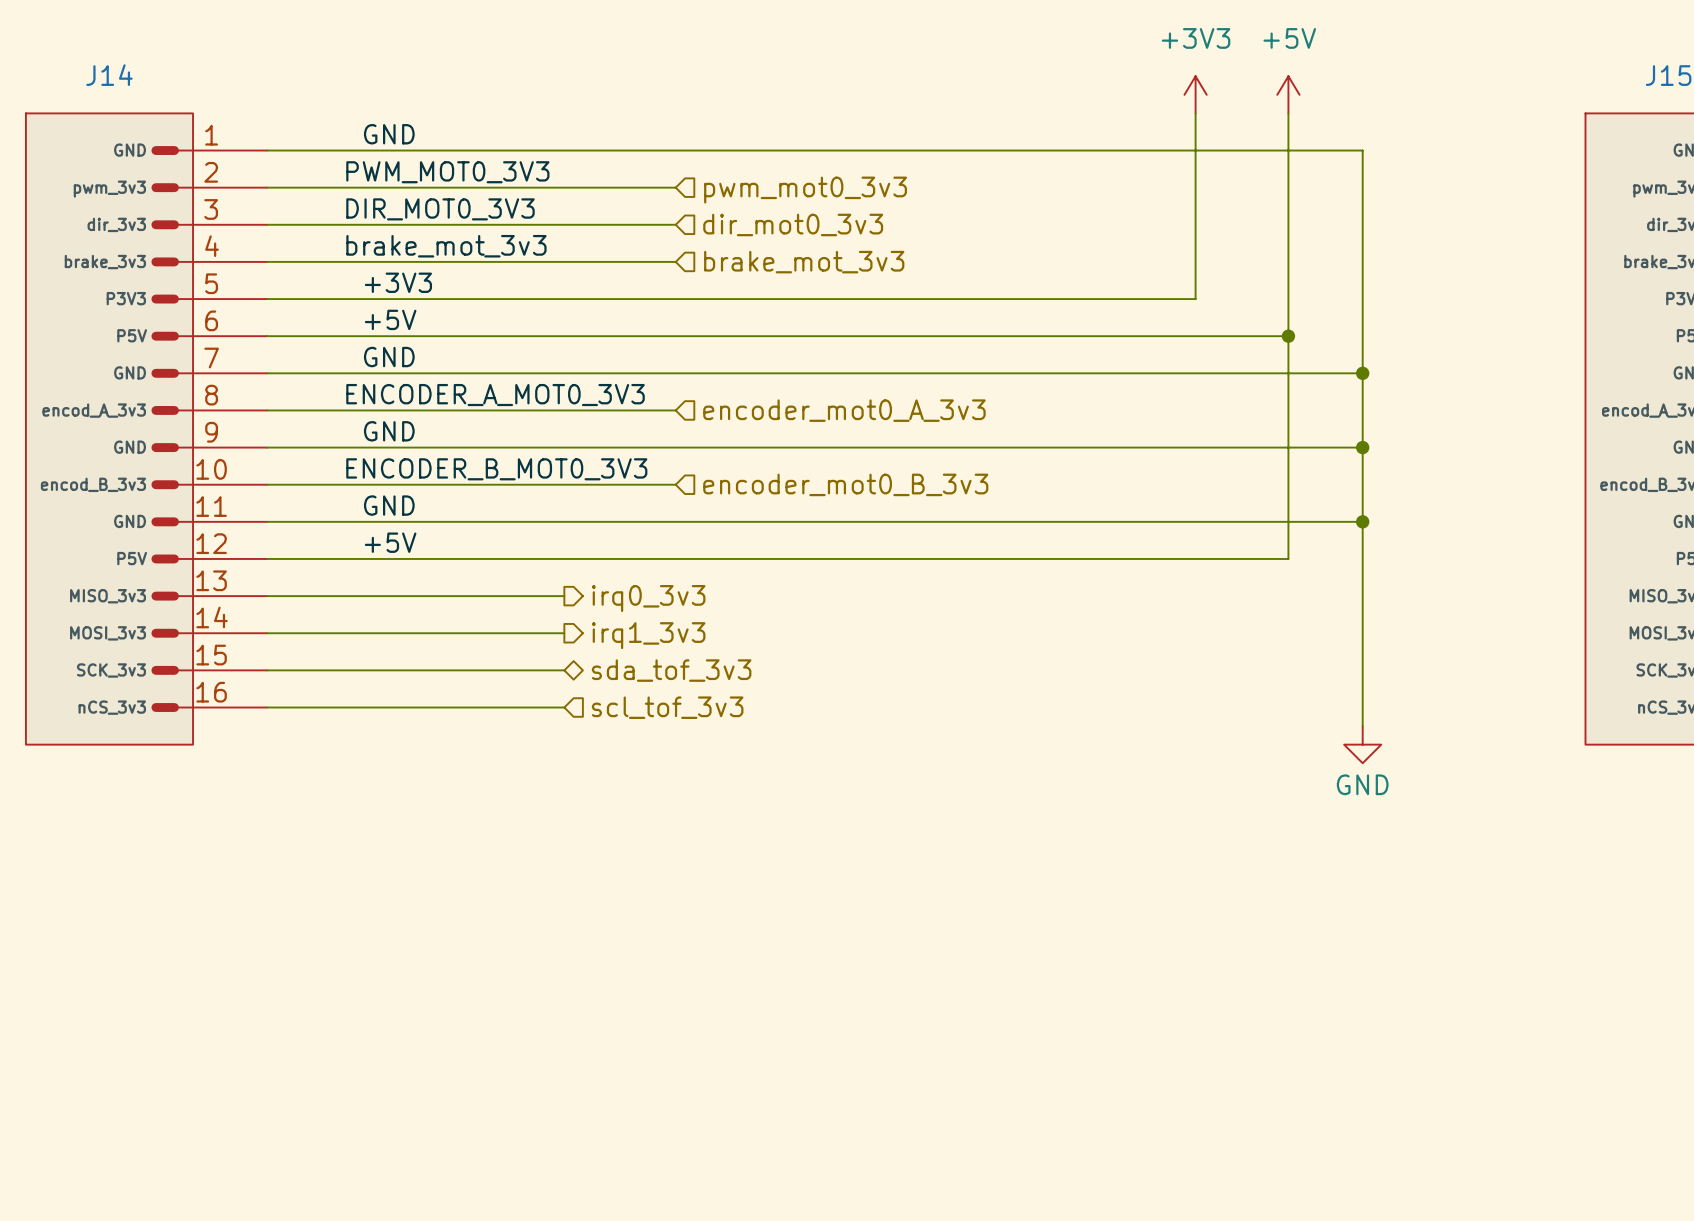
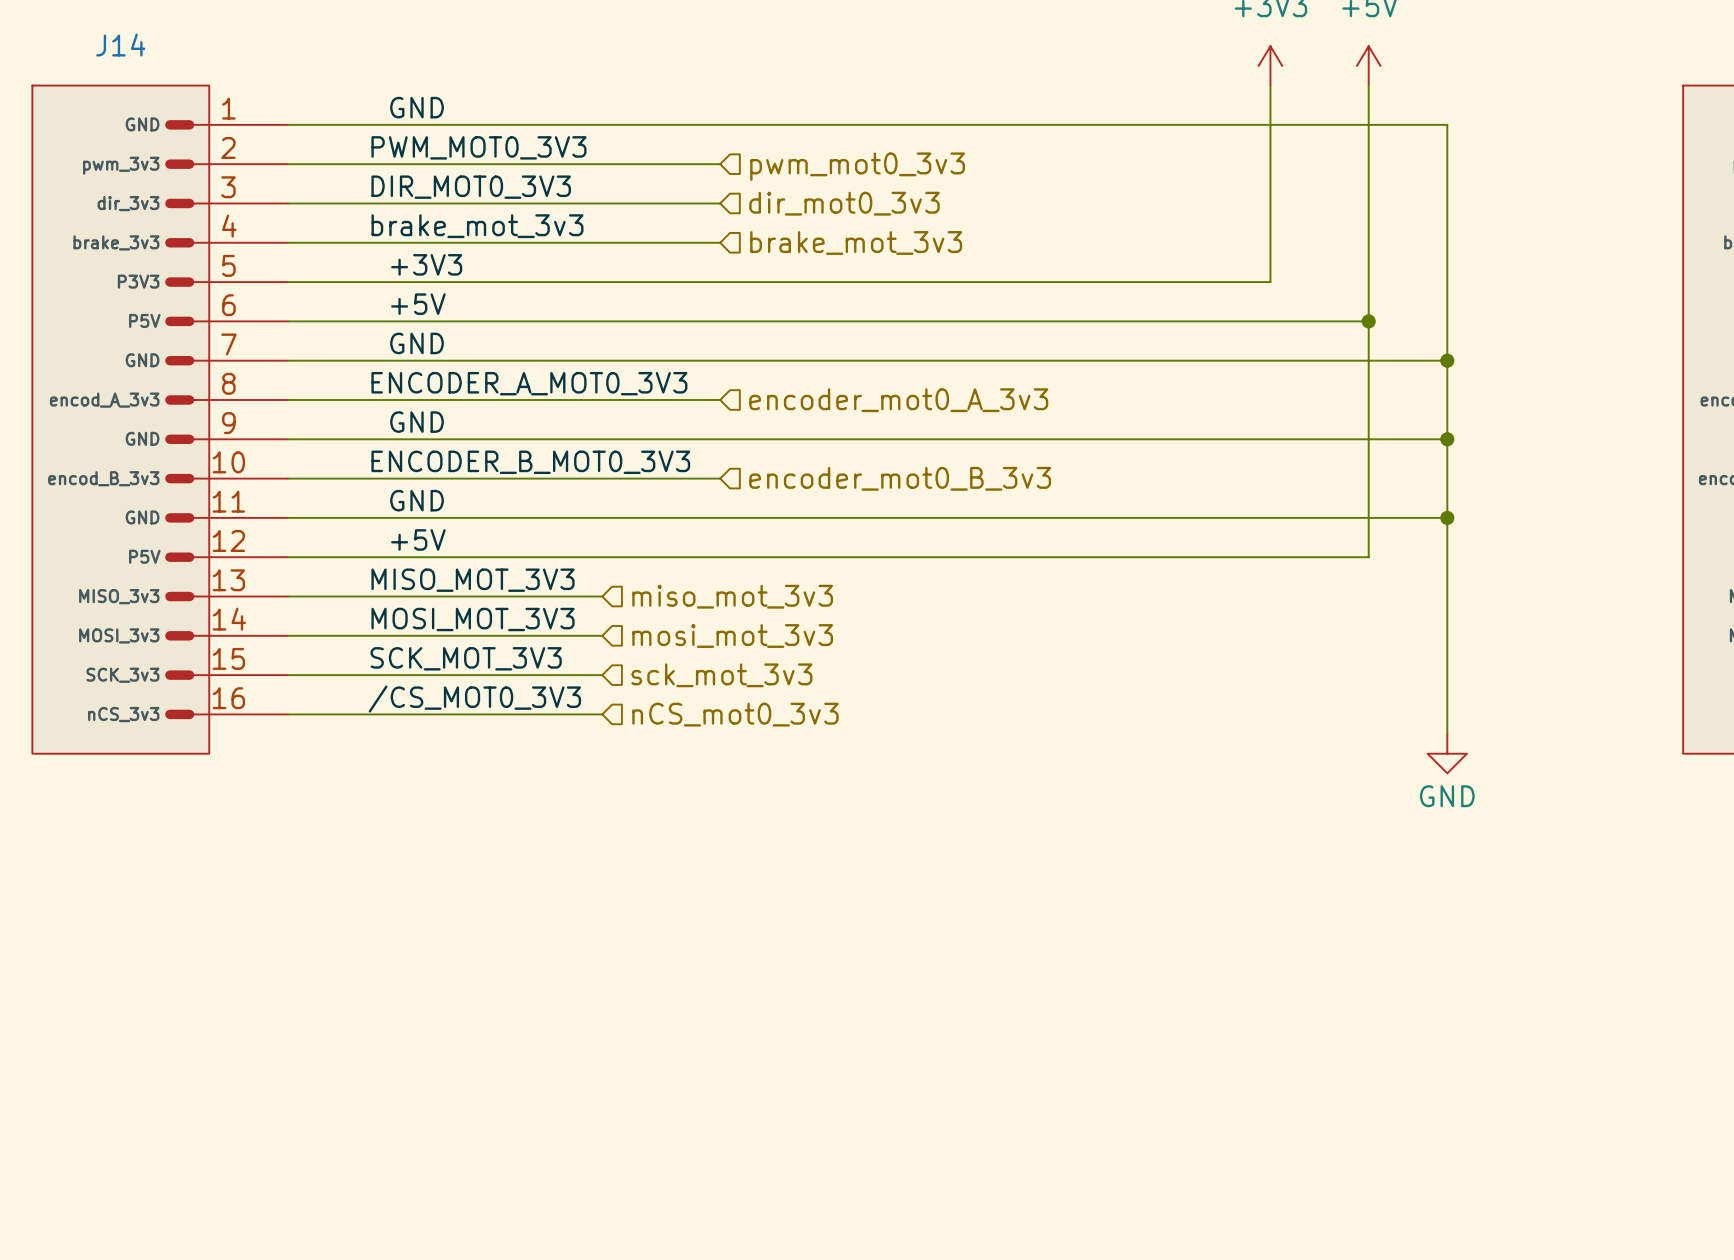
label: none -> MISO_MOT_3V3 (473, 580)
hierarchical label shape: output (648, 598) -> input (732, 596)
hierarchical label: irq0_3v3 (648, 598) -> miso_mot_3v3 (732, 596)
label: none -> MOSI_MOT_3V3 (473, 619)
hierarchical label shape: output (648, 635) -> input (732, 636)
hierarchical label: irq1_3v3 (648, 635) -> mosi_mot_3v3 (732, 636)
label: none -> SCK_MOT_3V3 (466, 658)
hierarchical label shape: bidirectional (671, 670) -> input (721, 675)
hierarchical label: sda_tof_3v3 (671, 670) -> sck_mot_3v3 (721, 675)
label: none -> /CS_MOT0_3V3 (474, 699)
hierarchical label: scl_tof_3v3 (667, 707) -> nCS_mot0_3v3 (735, 714)

